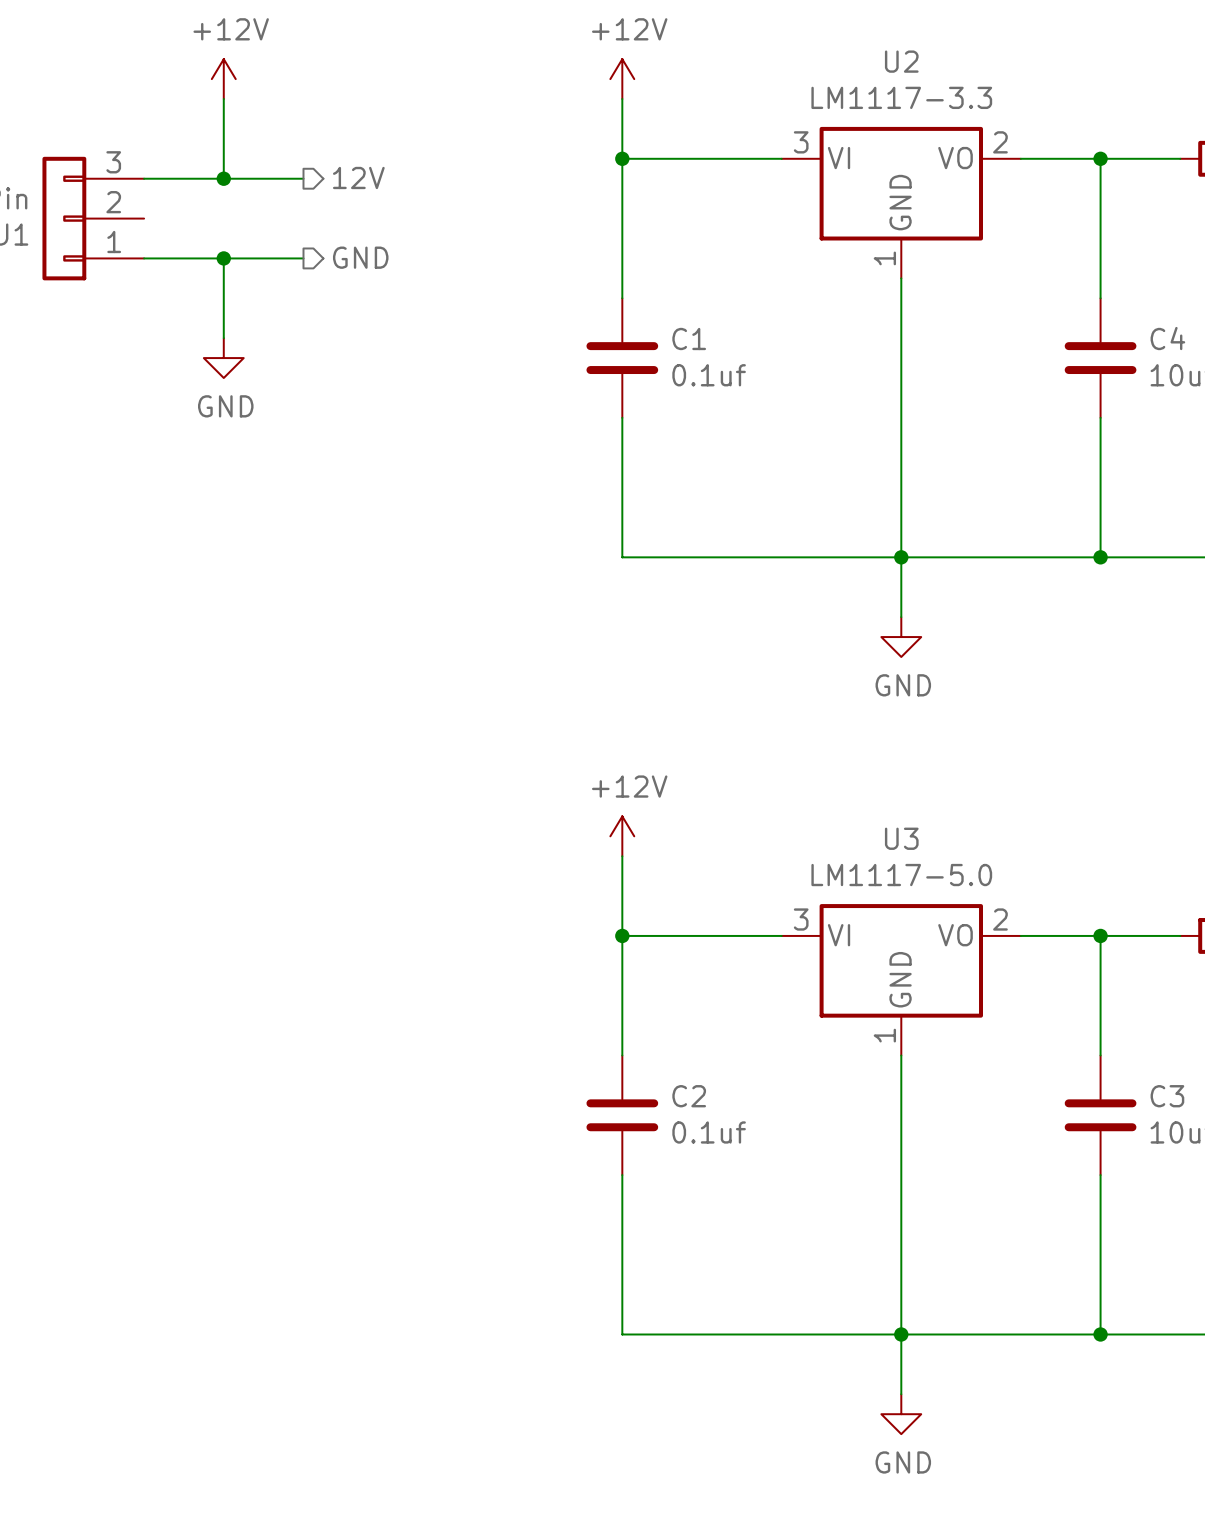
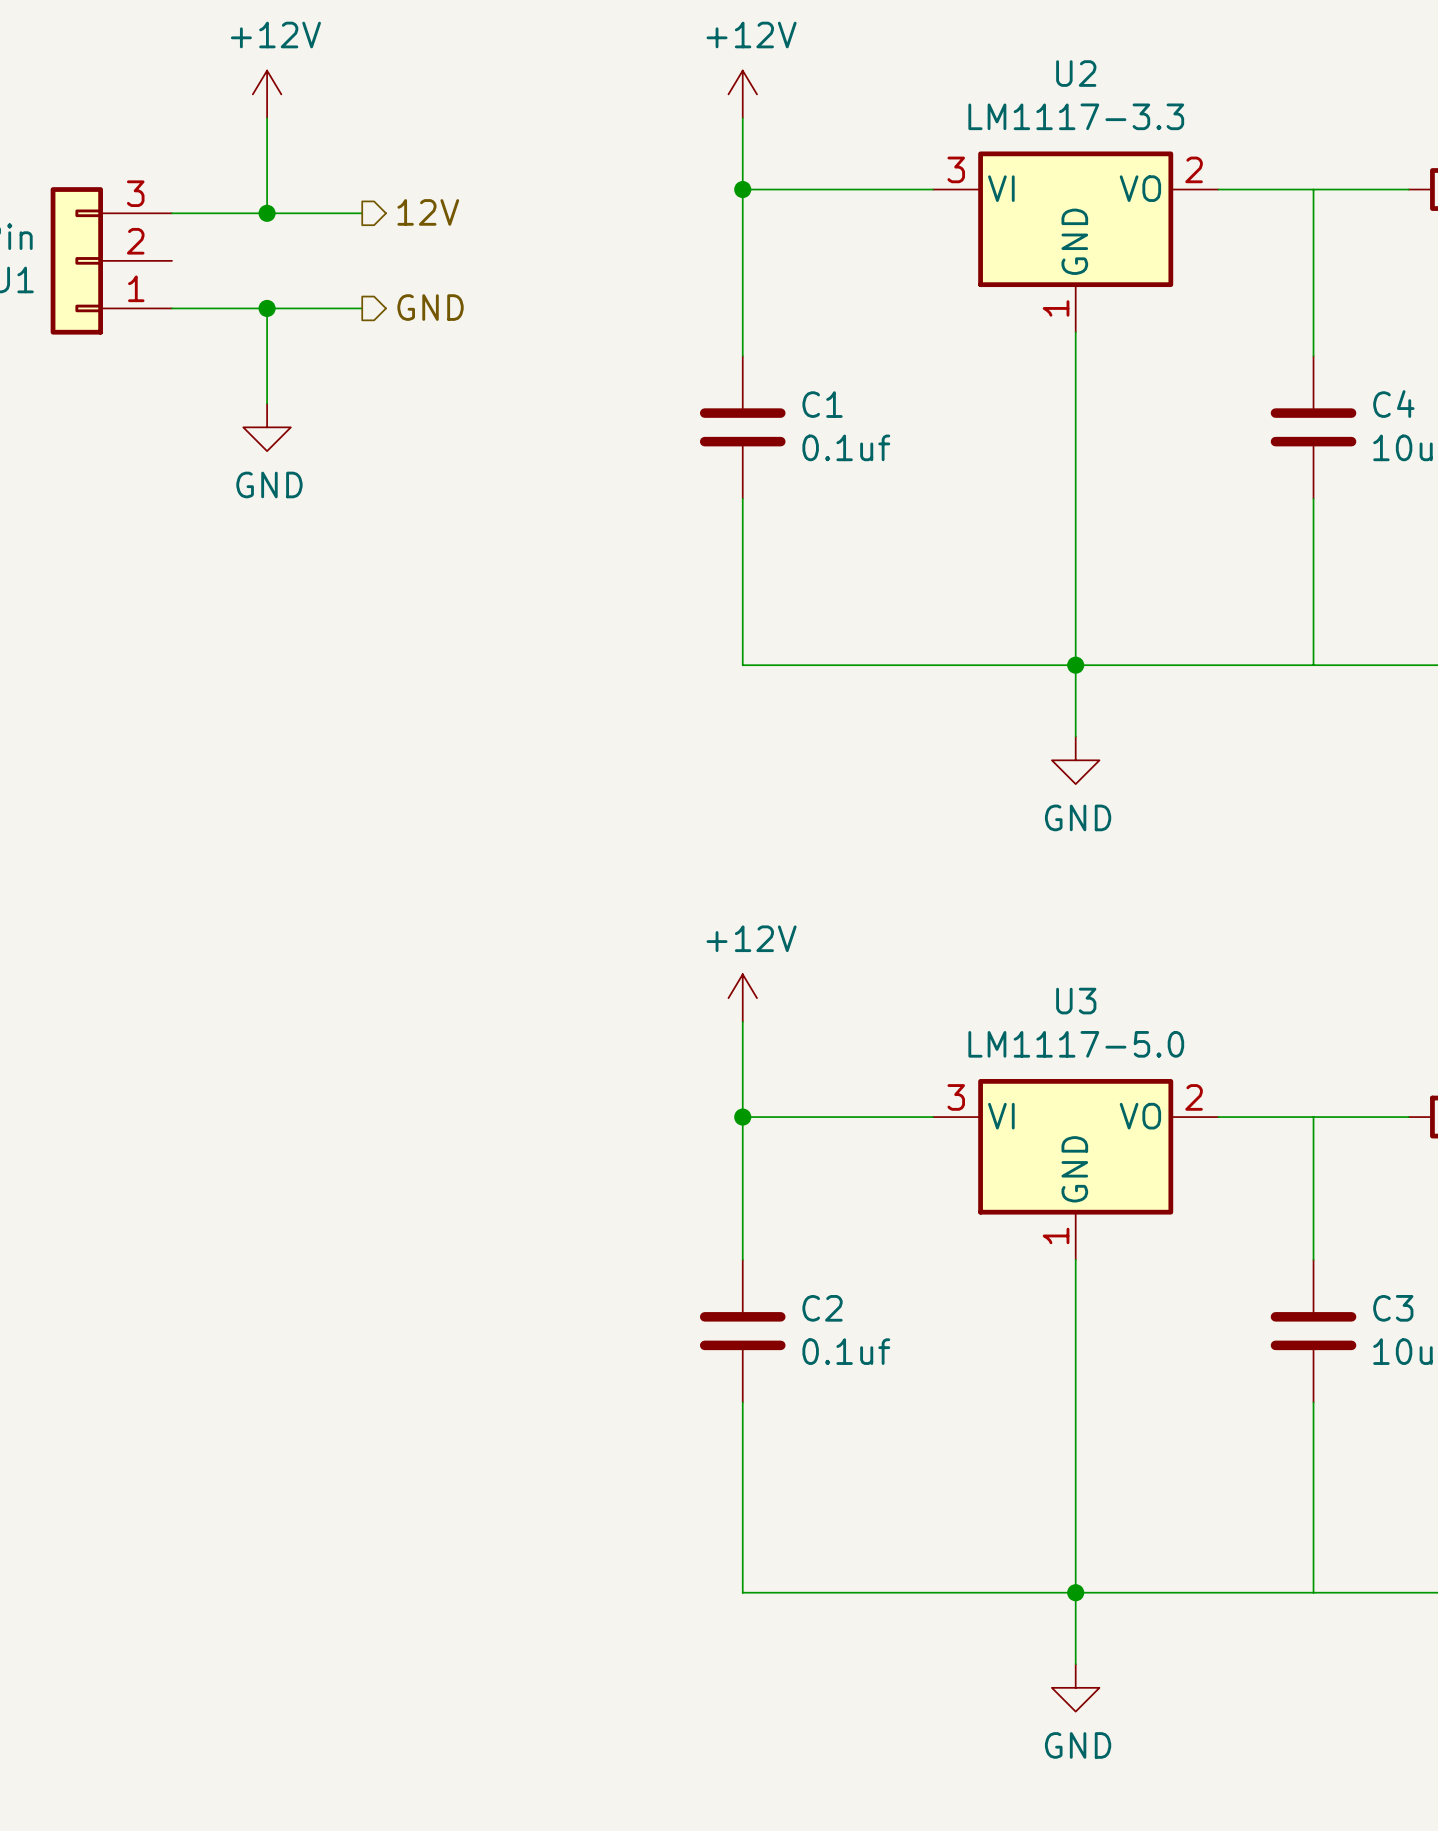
junction: (1100, 158) -> none
junction: (1100, 557) -> none
junction: (1100, 935) -> none
junction: (1100, 1334) -> none

